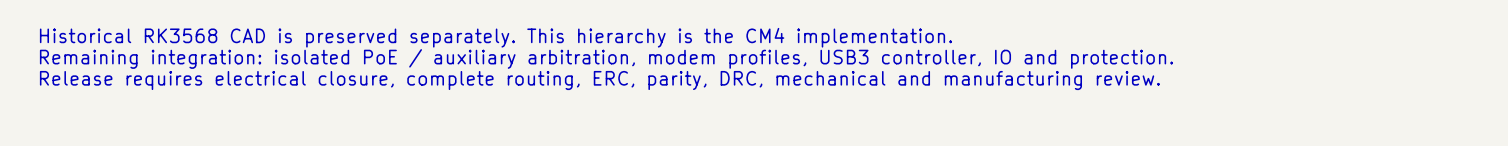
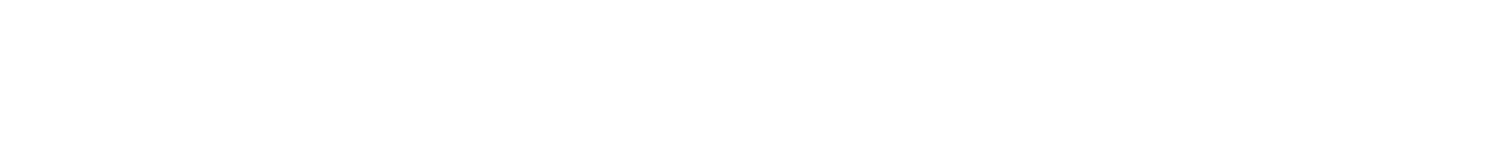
text: Historical RK3568 CAD is preserved separately. This hierarchy is the CM4 implementation. (495, 37) -> none
text: Remaining integration: isolated PoE / auxiliary arbitration, modem profiles, USB3 controller, IO and protection. (606, 58) -> none
text: Release requires electrical closure, complete routing, ERC, parity, DRC, mechanical and manufacturing review. (599, 80) -> none

